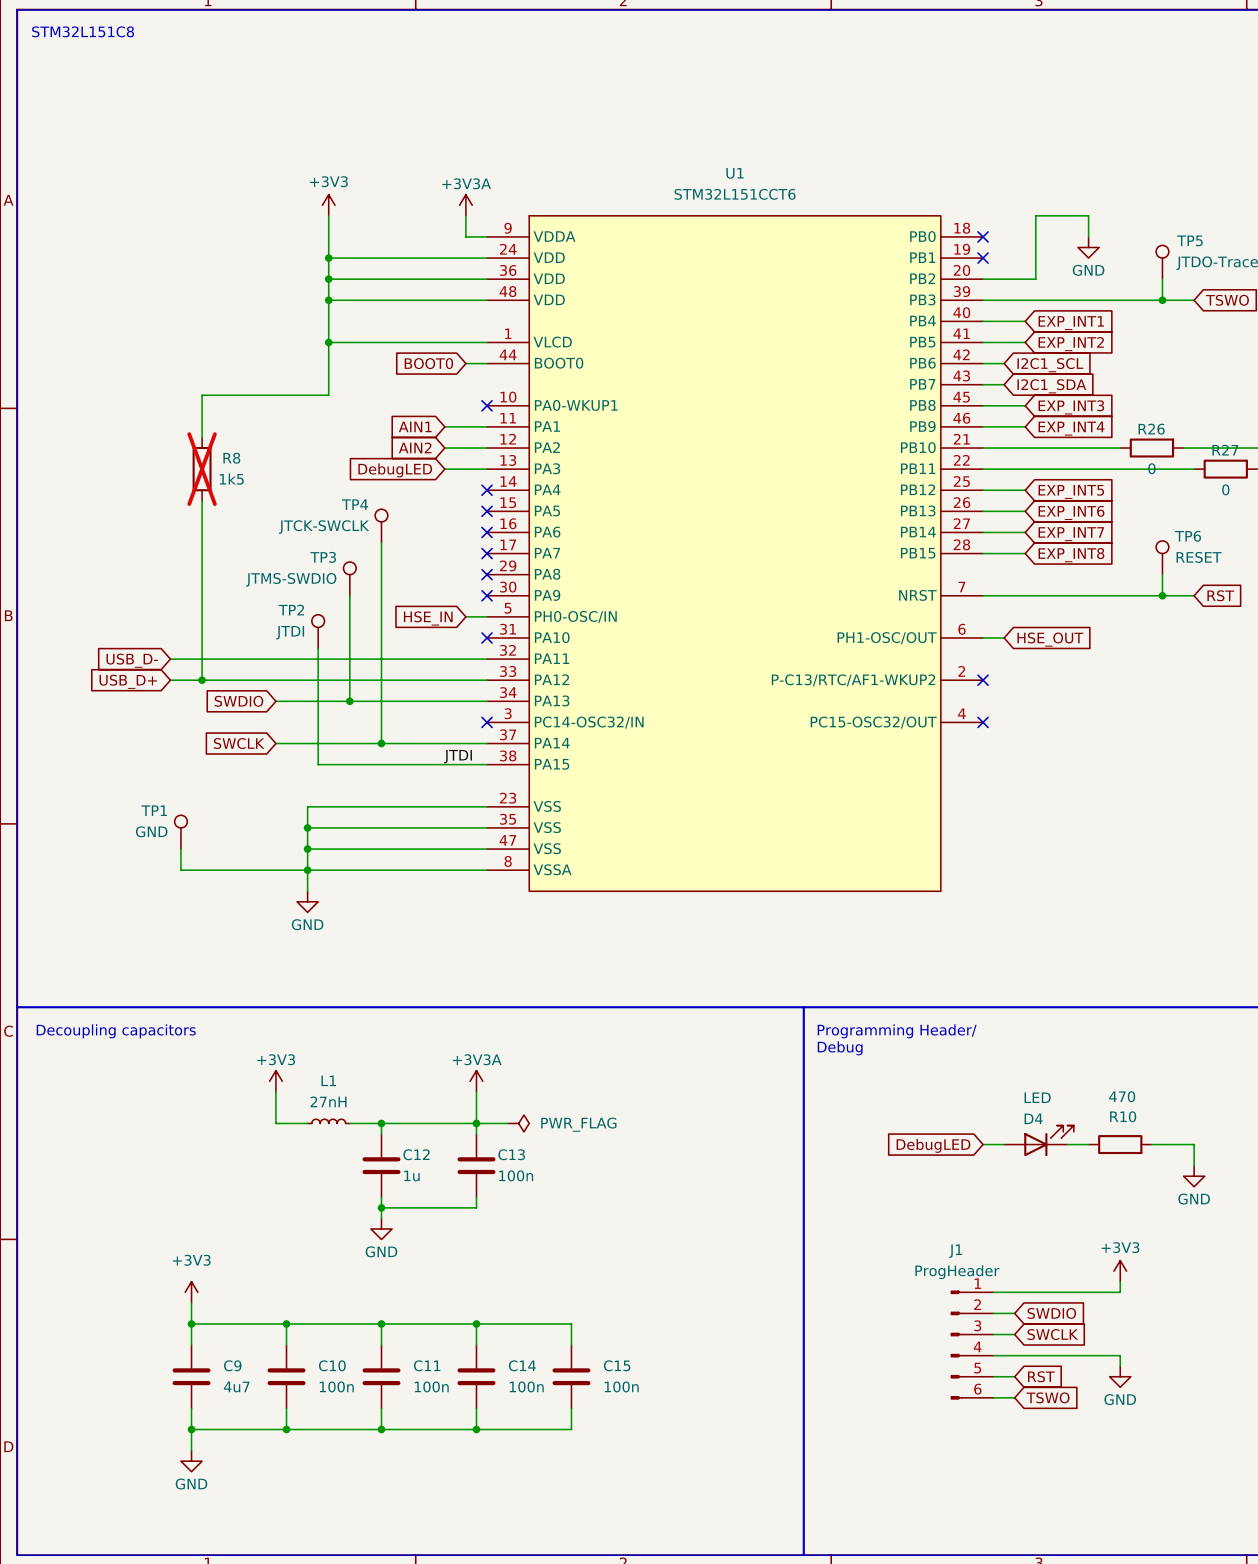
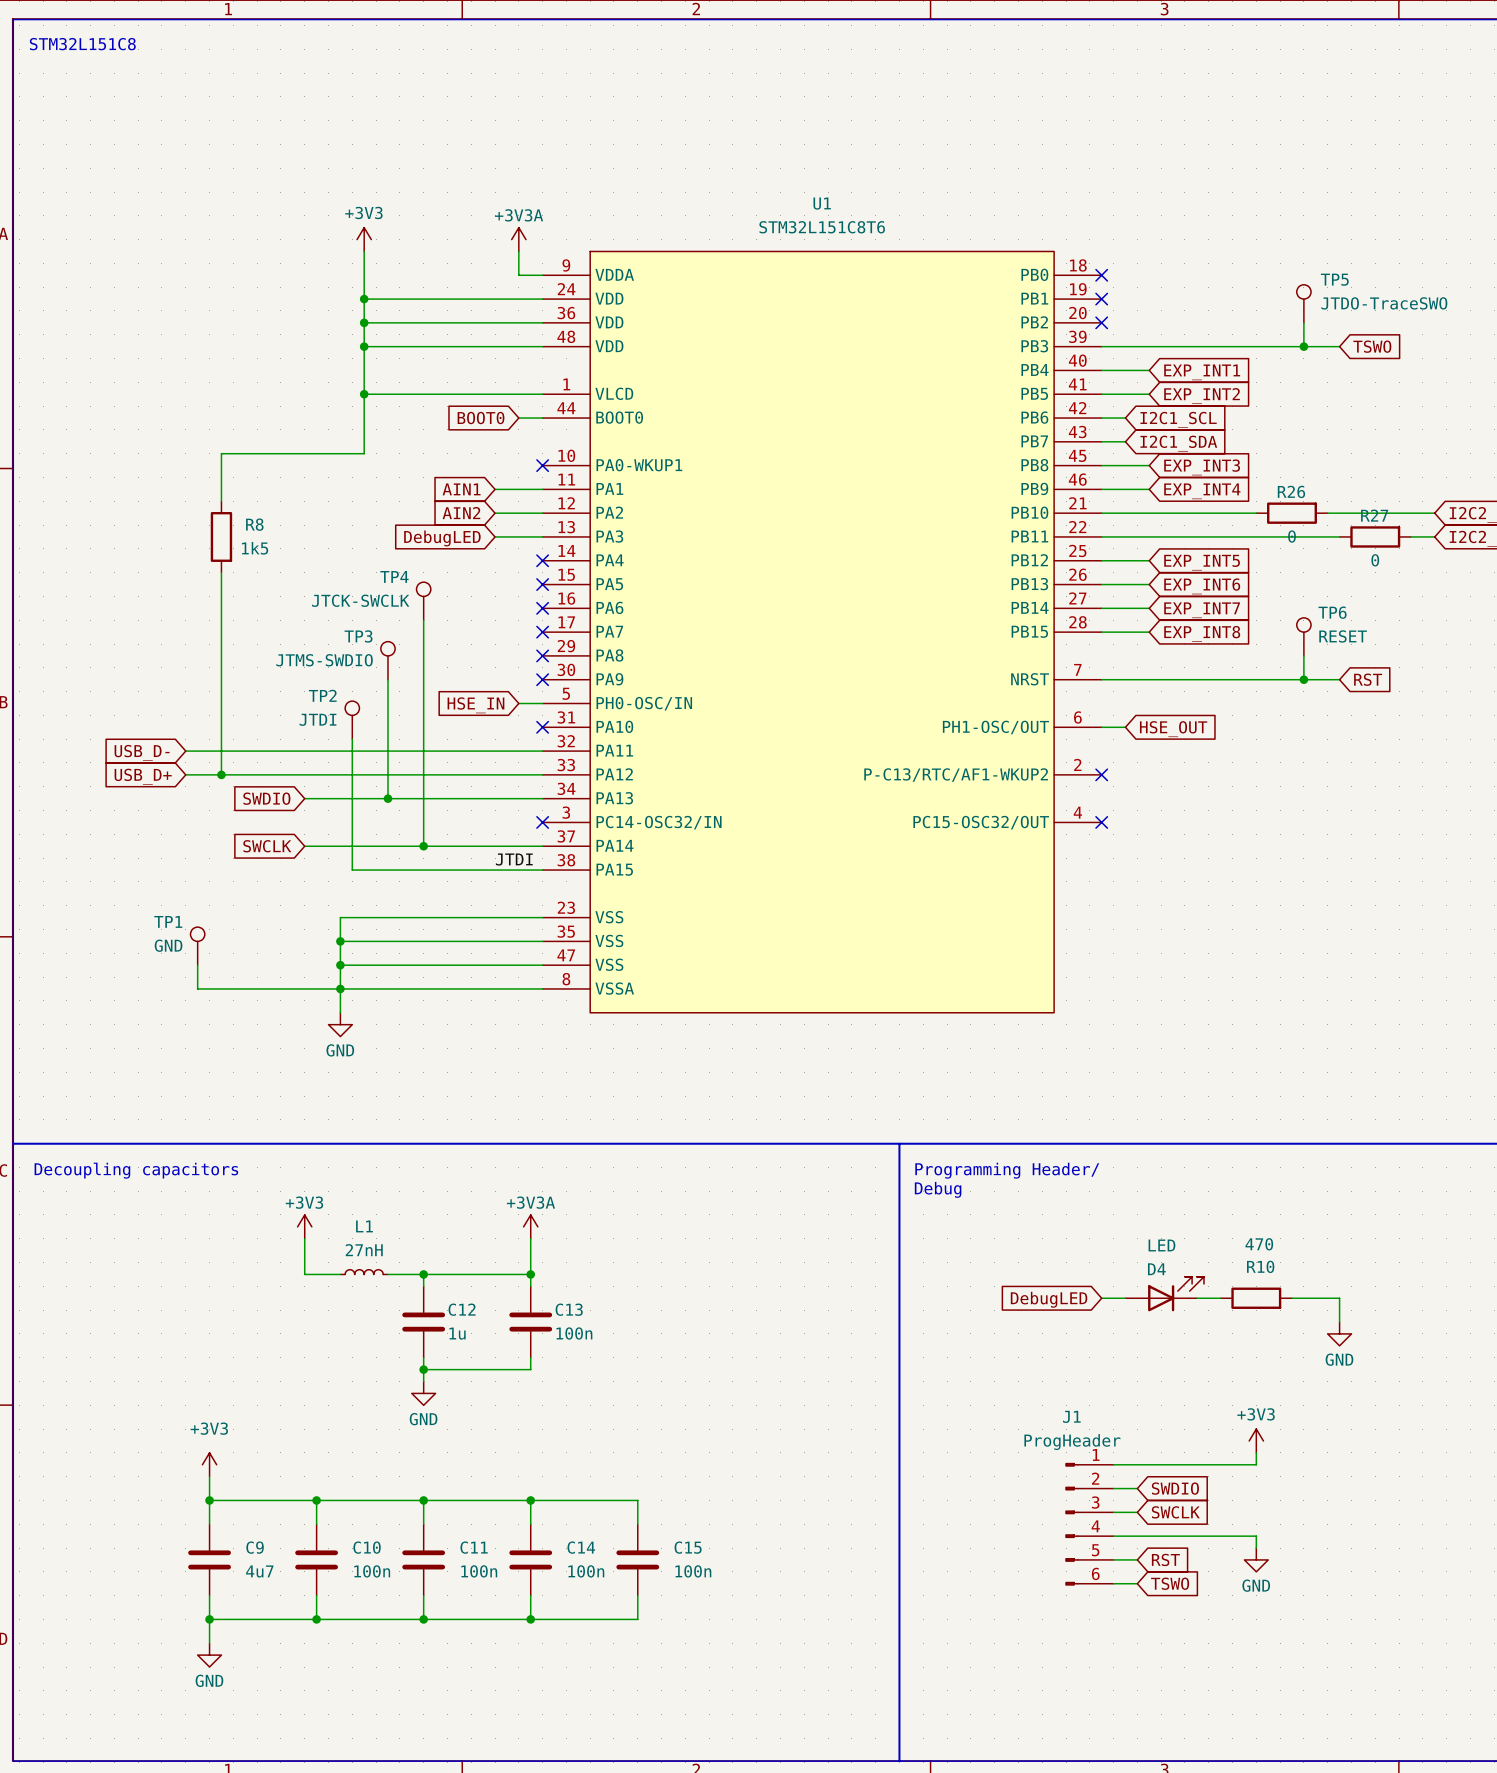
U1 value: STM32L151CCT6 (735, 194) -> STM32L151C8T6 (822, 227)
wire: (1088, 236) (1088, 215) (1035, 215) (1035, 279) (983, 279) -> none
power symbol: GND (1088, 247) -> none
no-connect mark: none -> (1101, 322)
R8 do-not-place cross: (202, 469) -> none
wire: (476, 1123) (508, 1123) -> none
power symbol: PWR_FLAG (518, 1123) -> none

